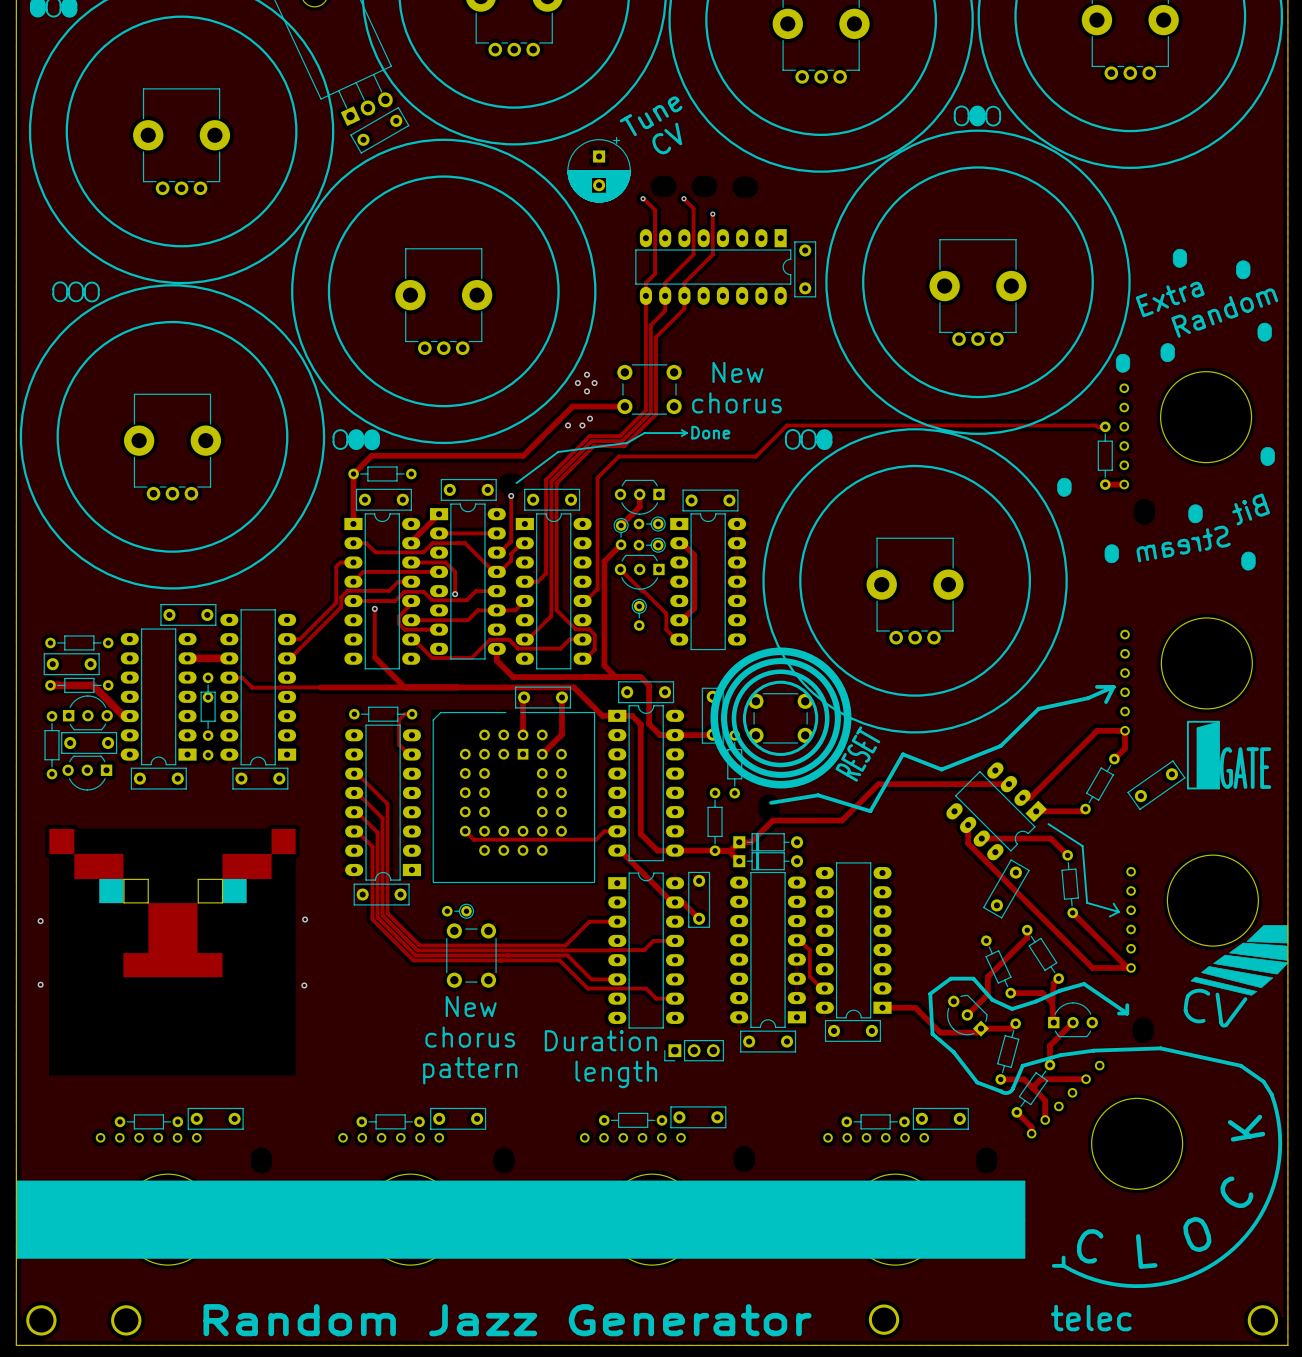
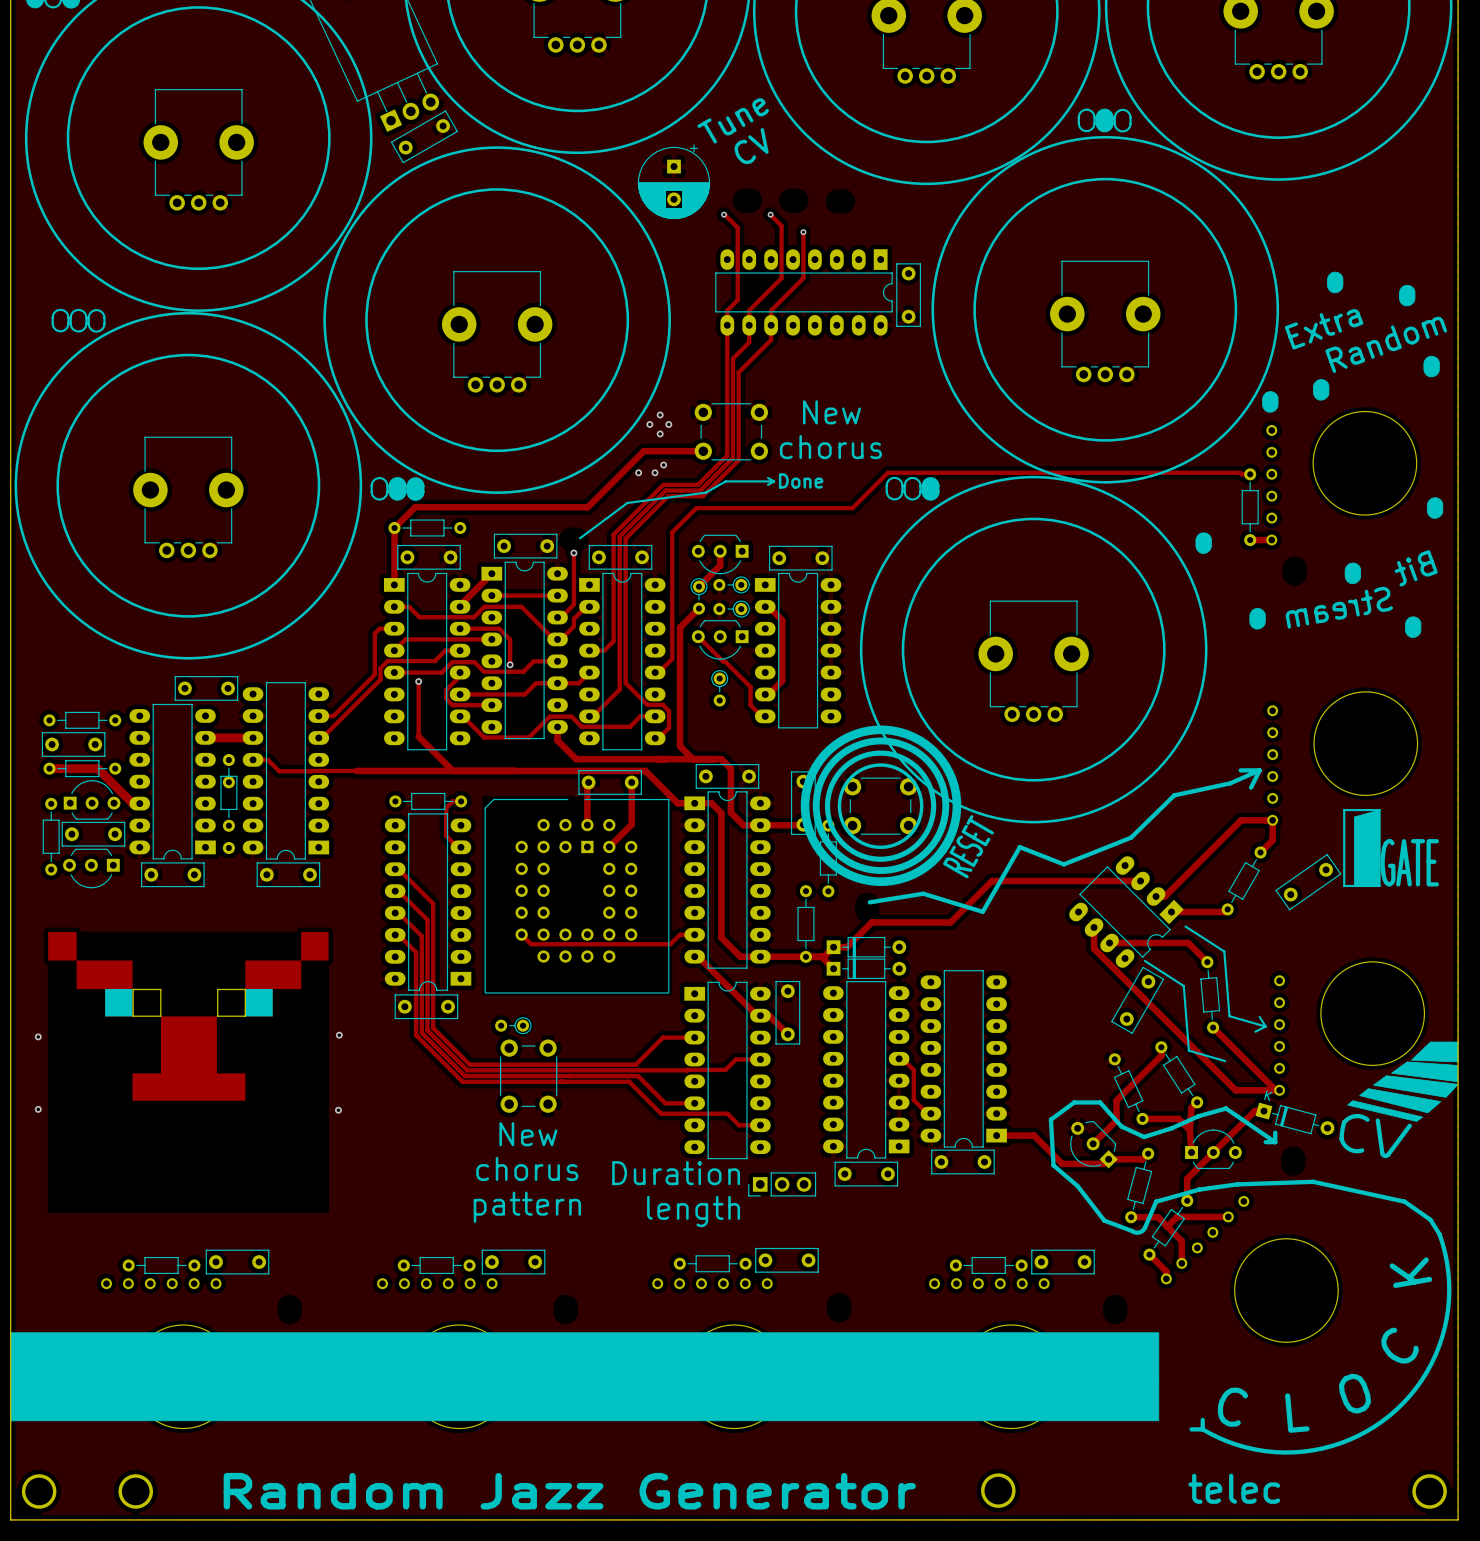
line: none -> (1144, 961) (1183, 986) (1188, 1050) (1225, 1061)
track: none -> (1263, 1111) (1254, 1111) (1213, 1152)
part: none -> (1294, 1118)

